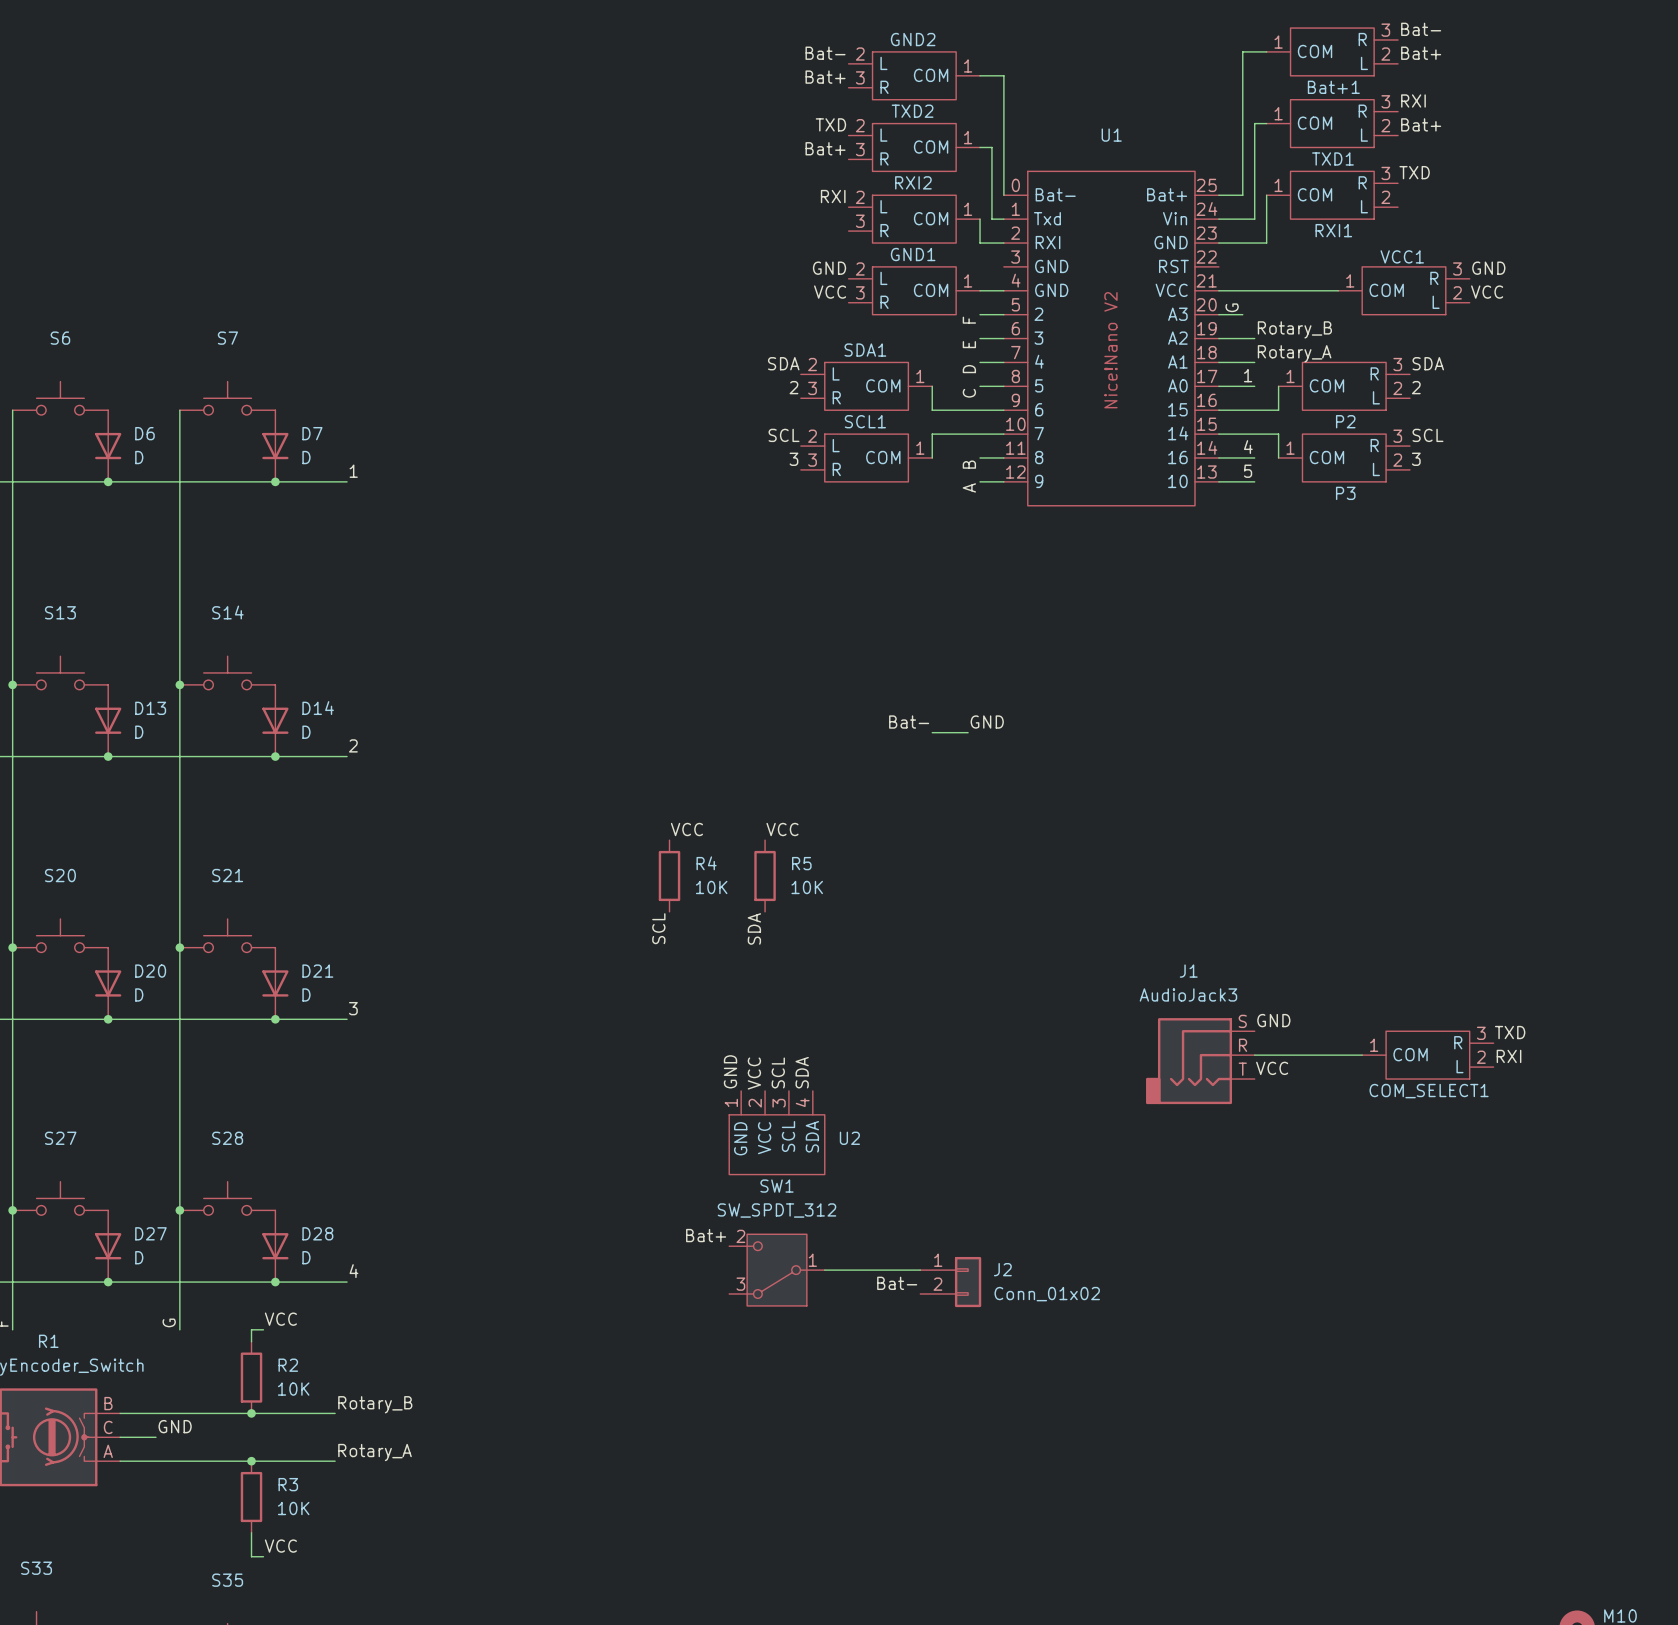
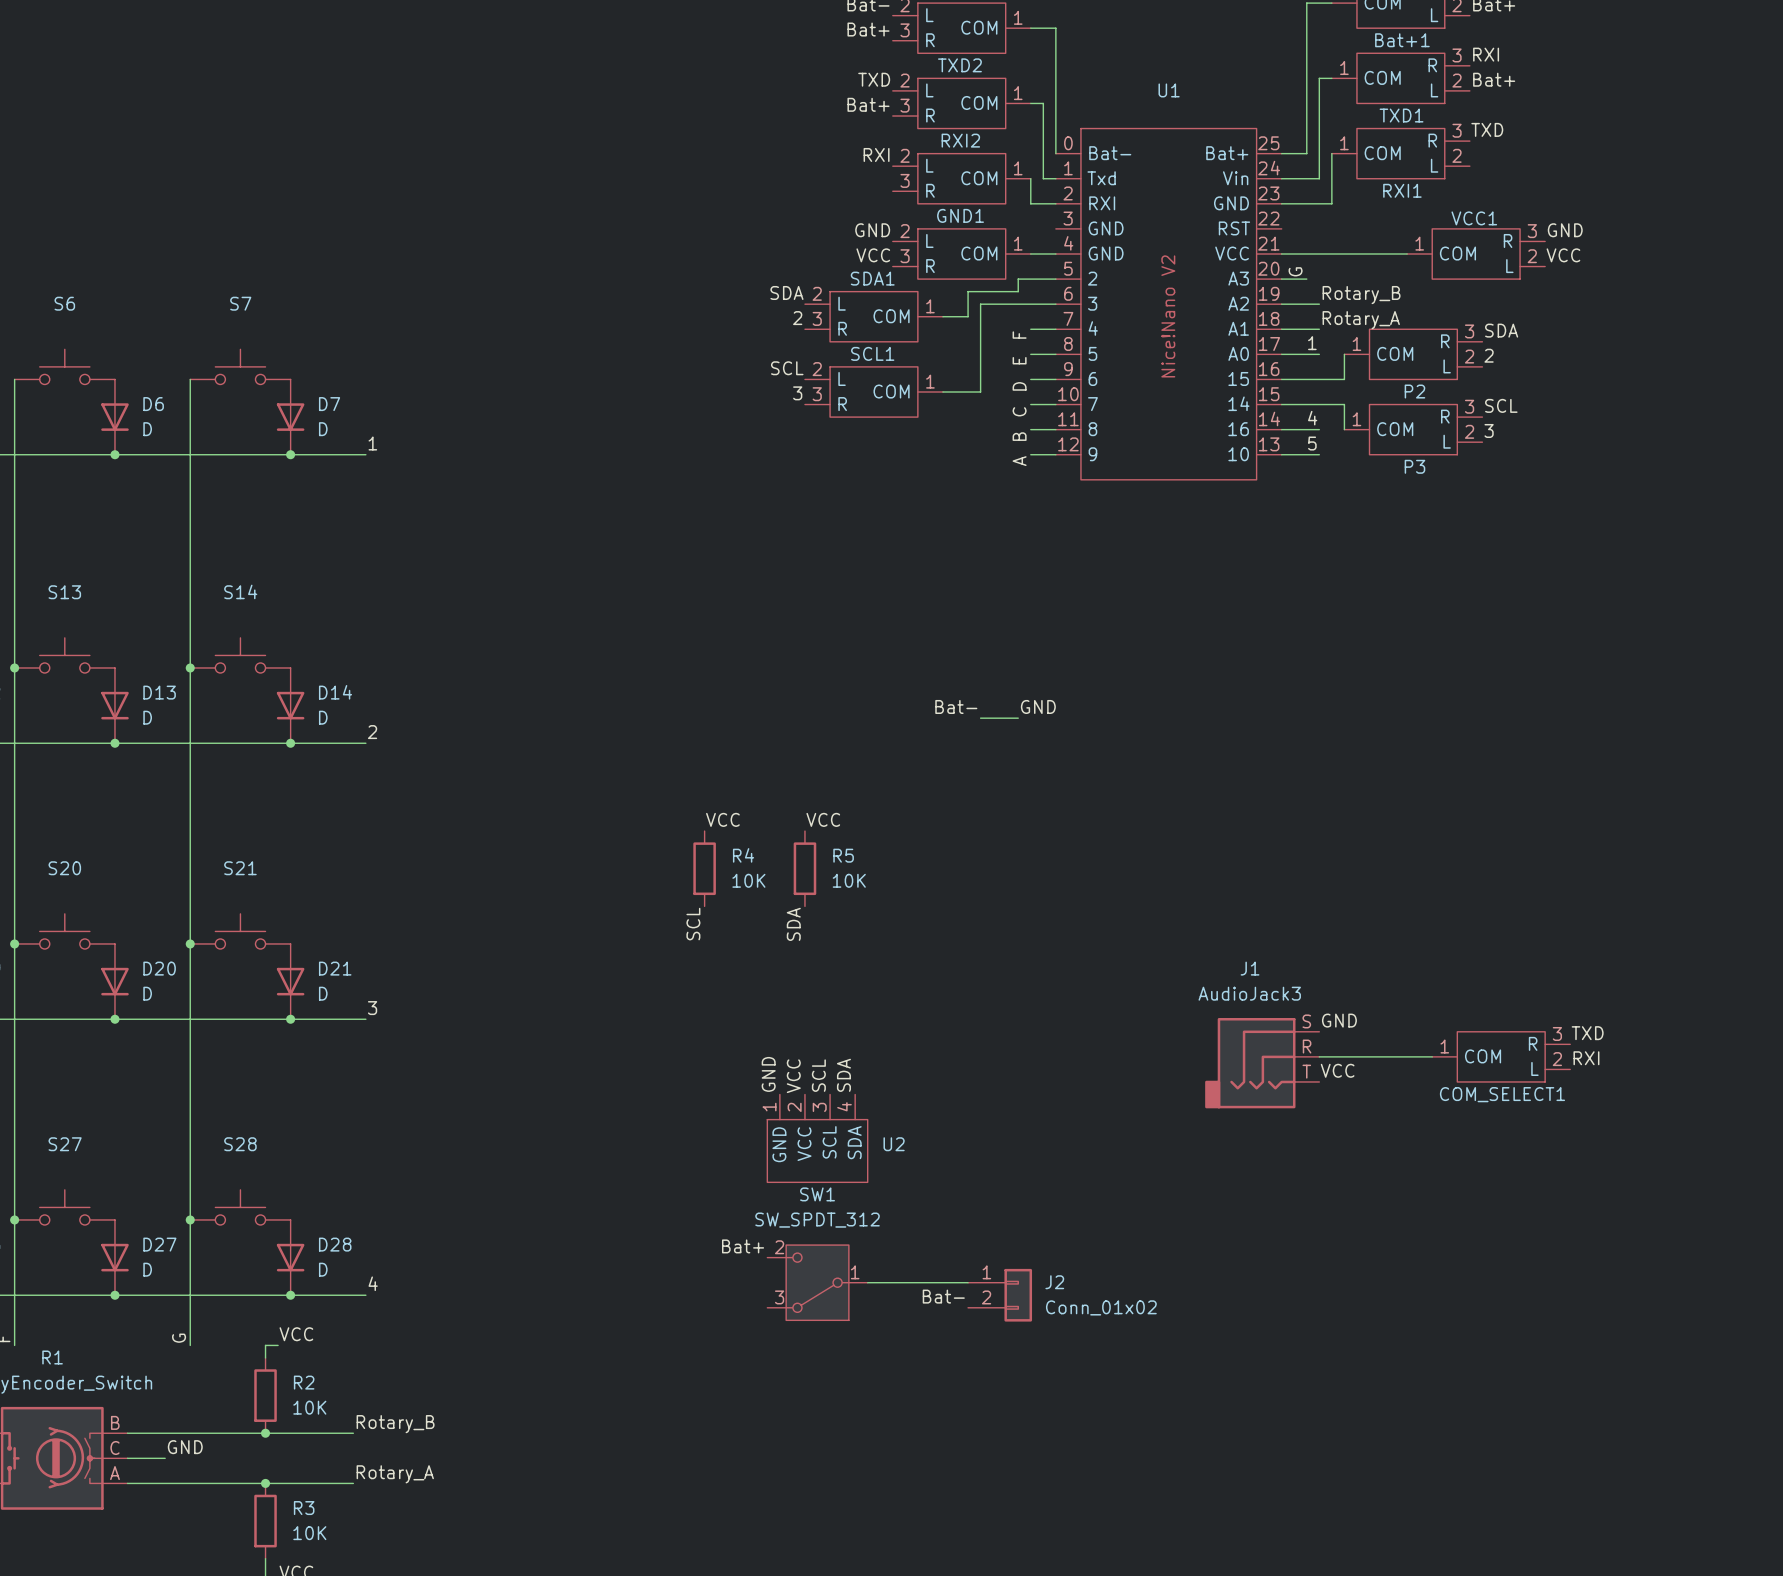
wire: none -> (1030, 279) (1018, 279) (1018, 291) (968, 291) (968, 316) (942, 316)
label: F (969, 320) -> none
wire: none -> (1030, 304) (980, 304) (980, 354)
label: E (969, 344) -> none
label position: SDA (783, 363) -> SDA (786, 292)
label: D (969, 369) -> F (1019, 335)
SDA1 position: (866, 386) -> (873, 316)
label position: 2 (793, 387) -> 2 (797, 318)
label: C (969, 393) -> E (1019, 360)
wire: (932, 410) (980, 410) -> (980, 379) (980, 391) (942, 391)
label: none -> D (1019, 386)
wire: (980, 434) (932, 434) (932, 457) -> none
label position: SCL (784, 435) -> SCL (787, 368)
label: none -> C (1019, 411)
SCL1 position: (866, 457) -> (873, 391)
label position: 3 (793, 459) -> 3 (797, 393)

